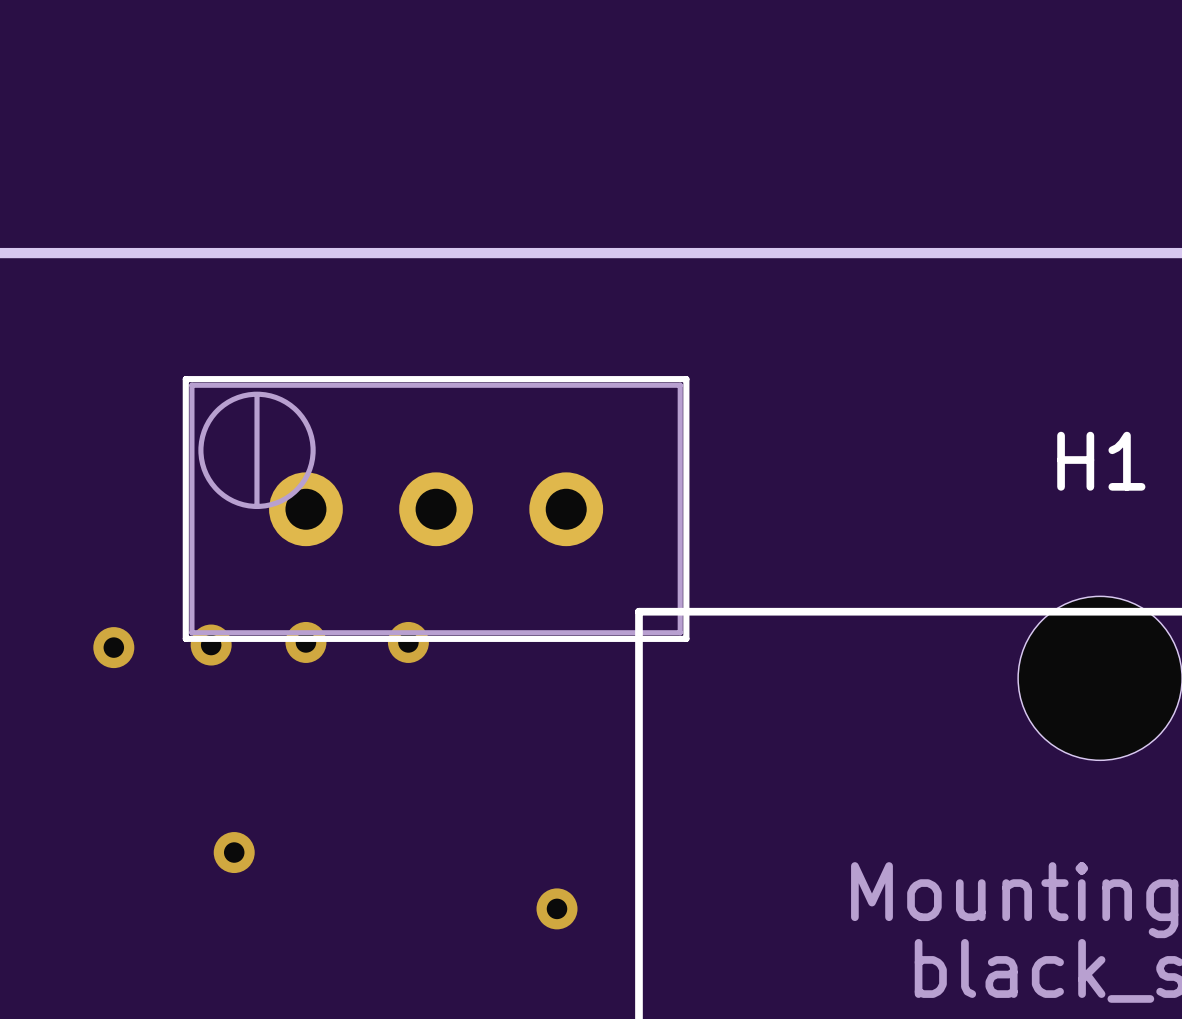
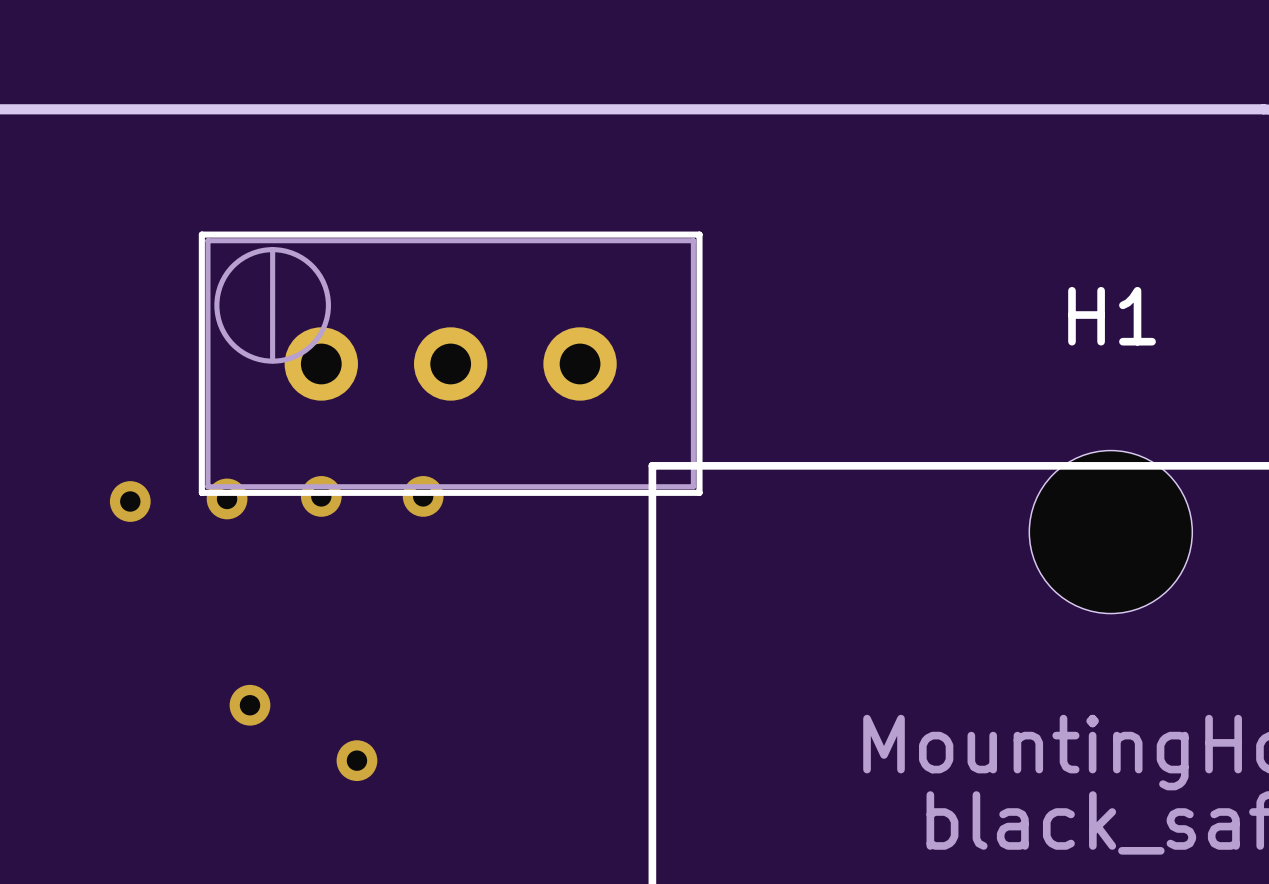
via position: (557, 908) -> (356, 760)

